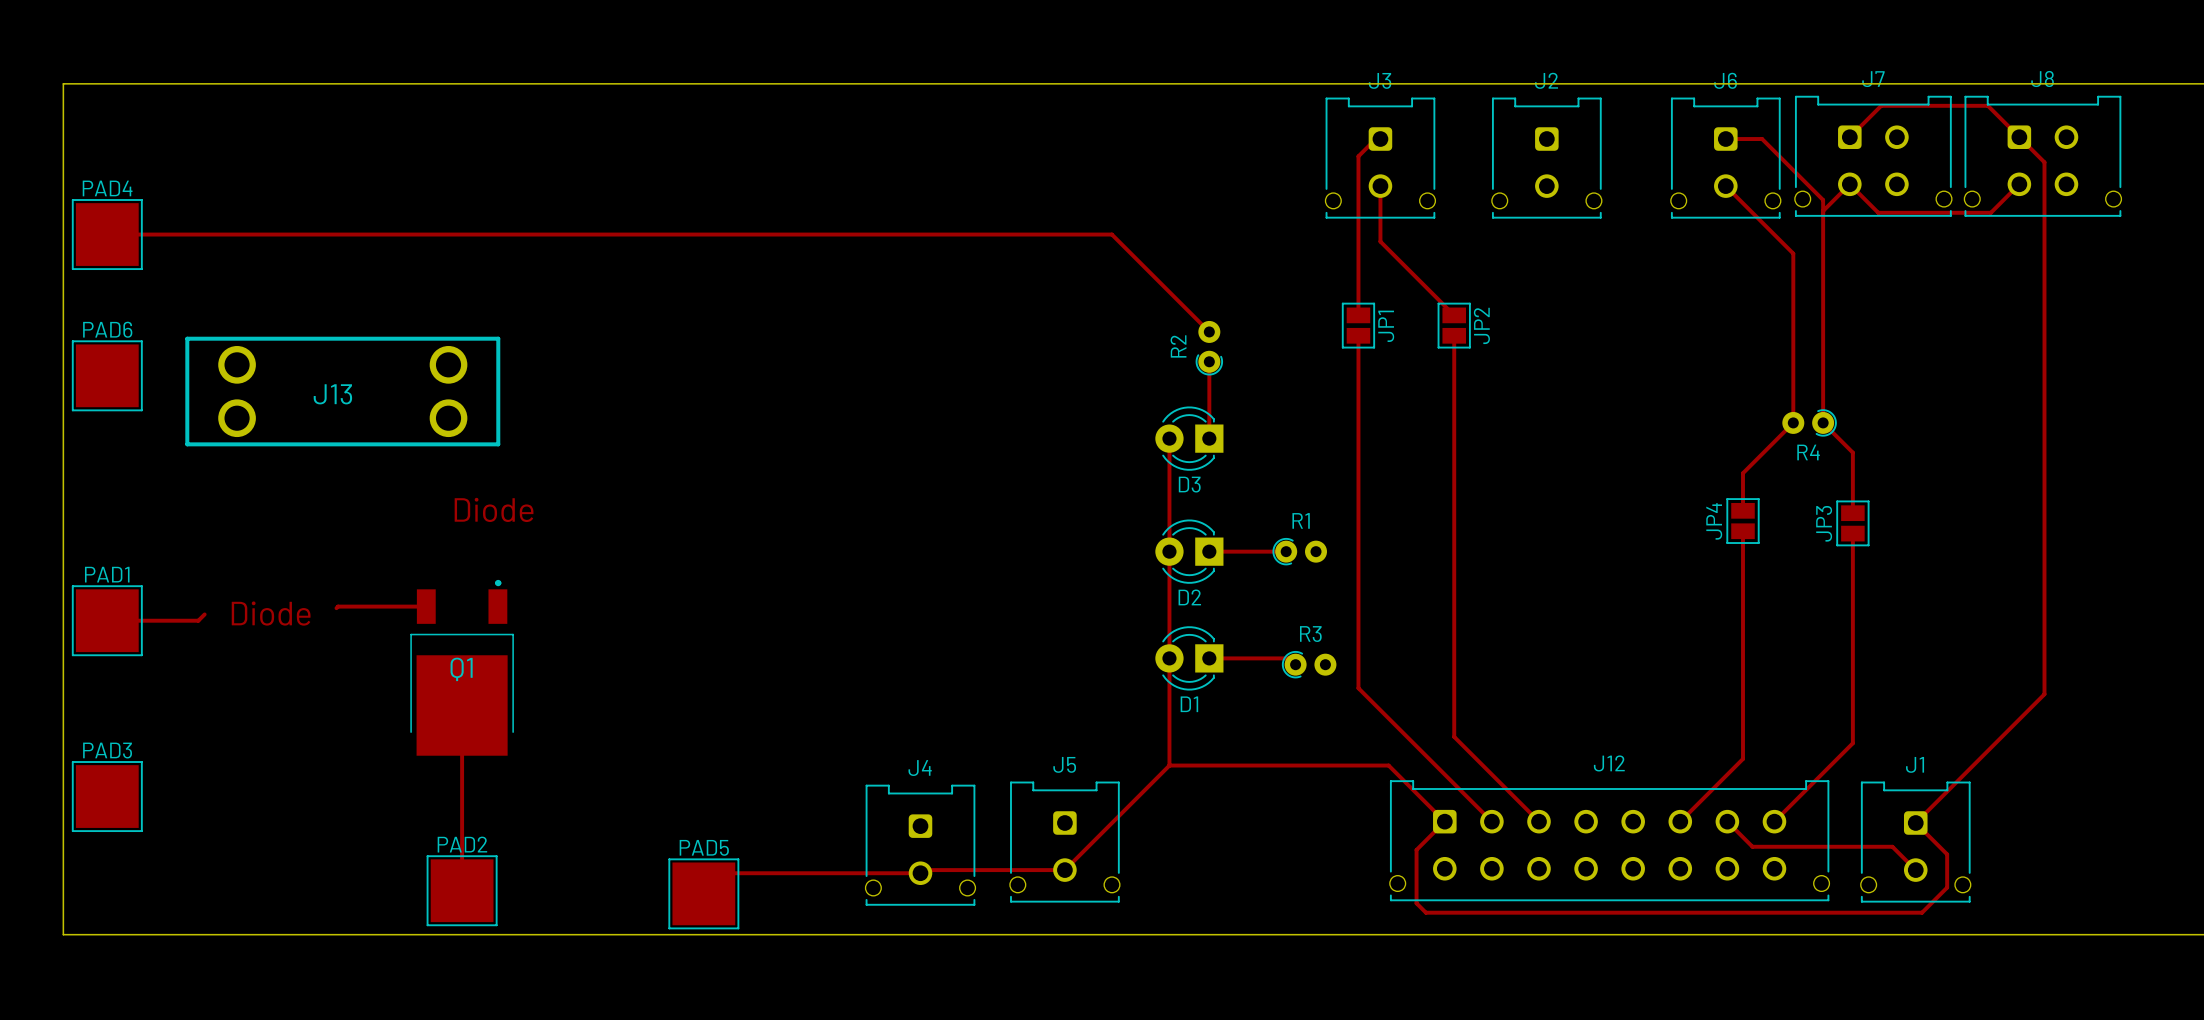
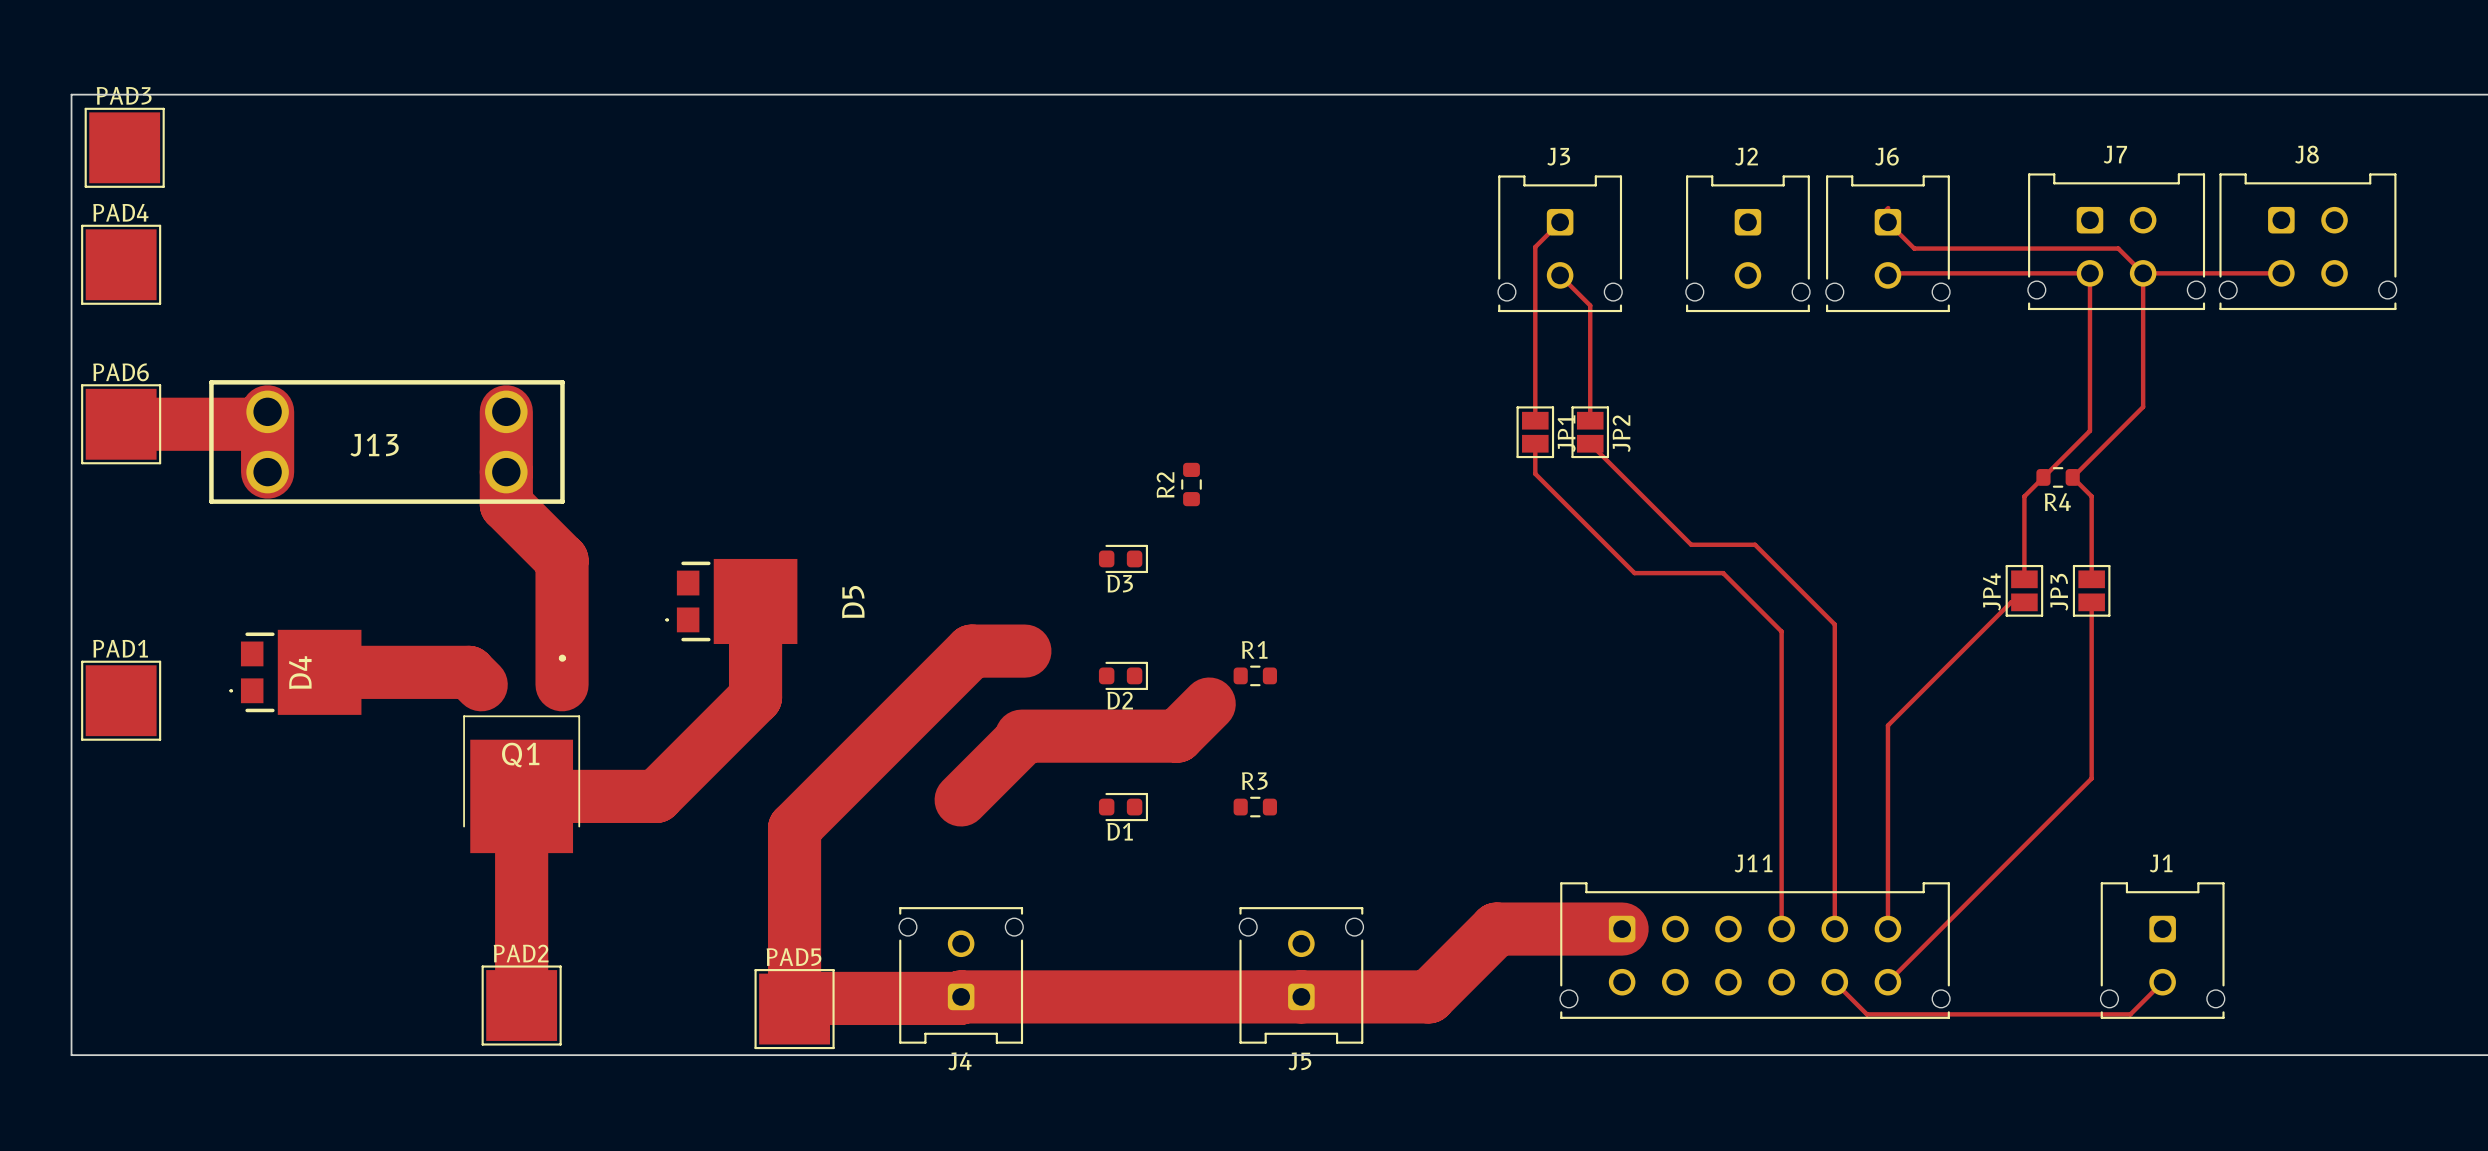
track: (1849, 137) (1881, 105) (1987, 105) (2044, 162) (2044, 694) (1915, 822) (1947, 854) (1947, 887) (1922, 912) (1425, 912) (1416, 903) (1416, 849) (1444, 821) (1388, 765) (1169, 765) -> none
track: (1380, 139) (1375, 139) (1358, 156) (1358, 315) -> none
track: (1725, 139) (1762, 139) (1823, 200) (1823, 422) (1852, 452) -> (2143, 273) (2143, 406) (2072, 477) (2091, 496) (2091, 511)
J7 position: (1873, 156) -> (2116, 241)
J8 position: (2042, 156) -> (2307, 241)
J3 position: (1380, 158) -> (1560, 243)
J2 position: (1546, 158) -> (1747, 243)
J6 position: (1725, 158) -> (1887, 243)
track: none -> (1888, 208) (1886, 210)
track: (2019, 184) (1990, 212) (1878, 212) (1849, 184) (1823, 210) -> none
track: (1380, 186) (1380, 241) (1454, 315) -> none
track: (1725, 186) (1793, 253) (1793, 422) (1743, 473) (1743, 510) -> none
track: none -> (1560, 222) (1535, 247) (1535, 420)
track: none -> (1887, 222) (1914, 248) (2118, 248) (2143, 273)
track: (107, 234) (1111, 234) (1209, 331) -> none
track: none -> (1889, 273) (2089, 273) (2089, 430) (2024, 496) (2024, 579)
track: none -> (2143, 273) (2281, 273)
track: none -> (1560, 275) (1590, 305) (1590, 420)
R2 footprint: [1195, 320, 1224, 376] -> [1181, 462, 1202, 507]
JP1 position: (1358, 325) -> (1535, 432)
JP2 position: (1454, 325) -> (1590, 432)
track: (1358, 335) (1358, 688) (1491, 821) -> none
track: (1454, 335) (1454, 736) (1539, 821) -> none
track: (1209, 361) (1209, 438) -> none
track: none -> (506, 411) (506, 504) (562, 560) (562, 684)
track: none -> (121, 424) (255, 424) (267, 411) (267, 472)
track: none -> (1535, 443) (1535, 473) (1634, 573) (1723, 573) (1781, 631) (1781, 929)
track: none -> (1590, 443) (1691, 544) (1755, 544) (1834, 624) (1834, 929)
D3 footprint: [1155, 406, 1224, 471] -> [1098, 544, 1149, 574]
R4 footprint: [1782, 409, 1837, 437] -> [2036, 467, 2080, 488]
track: (1169, 438) (1169, 765) -> none
text: Diode (494, 509) -> none
D2 footprint: [1155, 519, 1224, 584] -> [1098, 661, 1149, 690]
JP4 position: (1743, 521) -> (2024, 590)
track: (1743, 531) (1743, 758) (1680, 821) -> none
D5: none -> (731, 601)
track: none -> (755, 601) (755, 697) (656, 796) (521, 796)
track: none -> (2024, 602) (2011, 602) (1887, 725) (1887, 929)
R1 footprint: [1272, 537, 1327, 566] -> [1233, 665, 1278, 687]
track: (1209, 551) (1286, 551) -> none
track: none -> (1024, 651) (971, 651) (794, 828) (794, 1009) (805, 998) (1428, 996) (1496, 929) (1622, 929)
D4: none -> (295, 672)
track: (426, 606) (338, 606) (336, 608) -> (481, 684) (468, 672) (319, 672)
text: Diode (271, 613) -> none
track: (204, 614) (198, 620) (107, 620) -> none
track: none -> (1209, 704) (1177, 736) (1021, 736)
D1 footprint: [1155, 626, 1224, 691] -> [1098, 792, 1149, 822]
R3 footprint: [1281, 650, 1337, 679] -> [1233, 796, 1278, 818]
track: none -> (1021, 739) (961, 799)
track: (1209, 658) (1289, 658) (1295, 664) -> none
track: (1852, 689) (1852, 743) (1774, 821) -> (2091, 778) (1887, 982)
track width: thin (462, 705) (462, 890) -> thick (521, 796) (521, 1005)
track: (1169, 765) (1064, 870) (923, 870) (920, 873) (724, 873) -> none
PAD3 position: (107, 796) -> (124, 147)
track: (1727, 821) (1752, 846) (1892, 846) (1915, 870) -> (1834, 982) (1866, 1014) (2130, 1014) (2162, 982)
J12: (1609, 840) -> none
J5 rotation: 0° (1064, 842) -> 180° (1301, 975)
J5 position: (1064, 842) -> (1301, 975)
J11: none -> (1755, 950)
J4 rotation: 0° (920, 845) -> 180° (961, 975)

